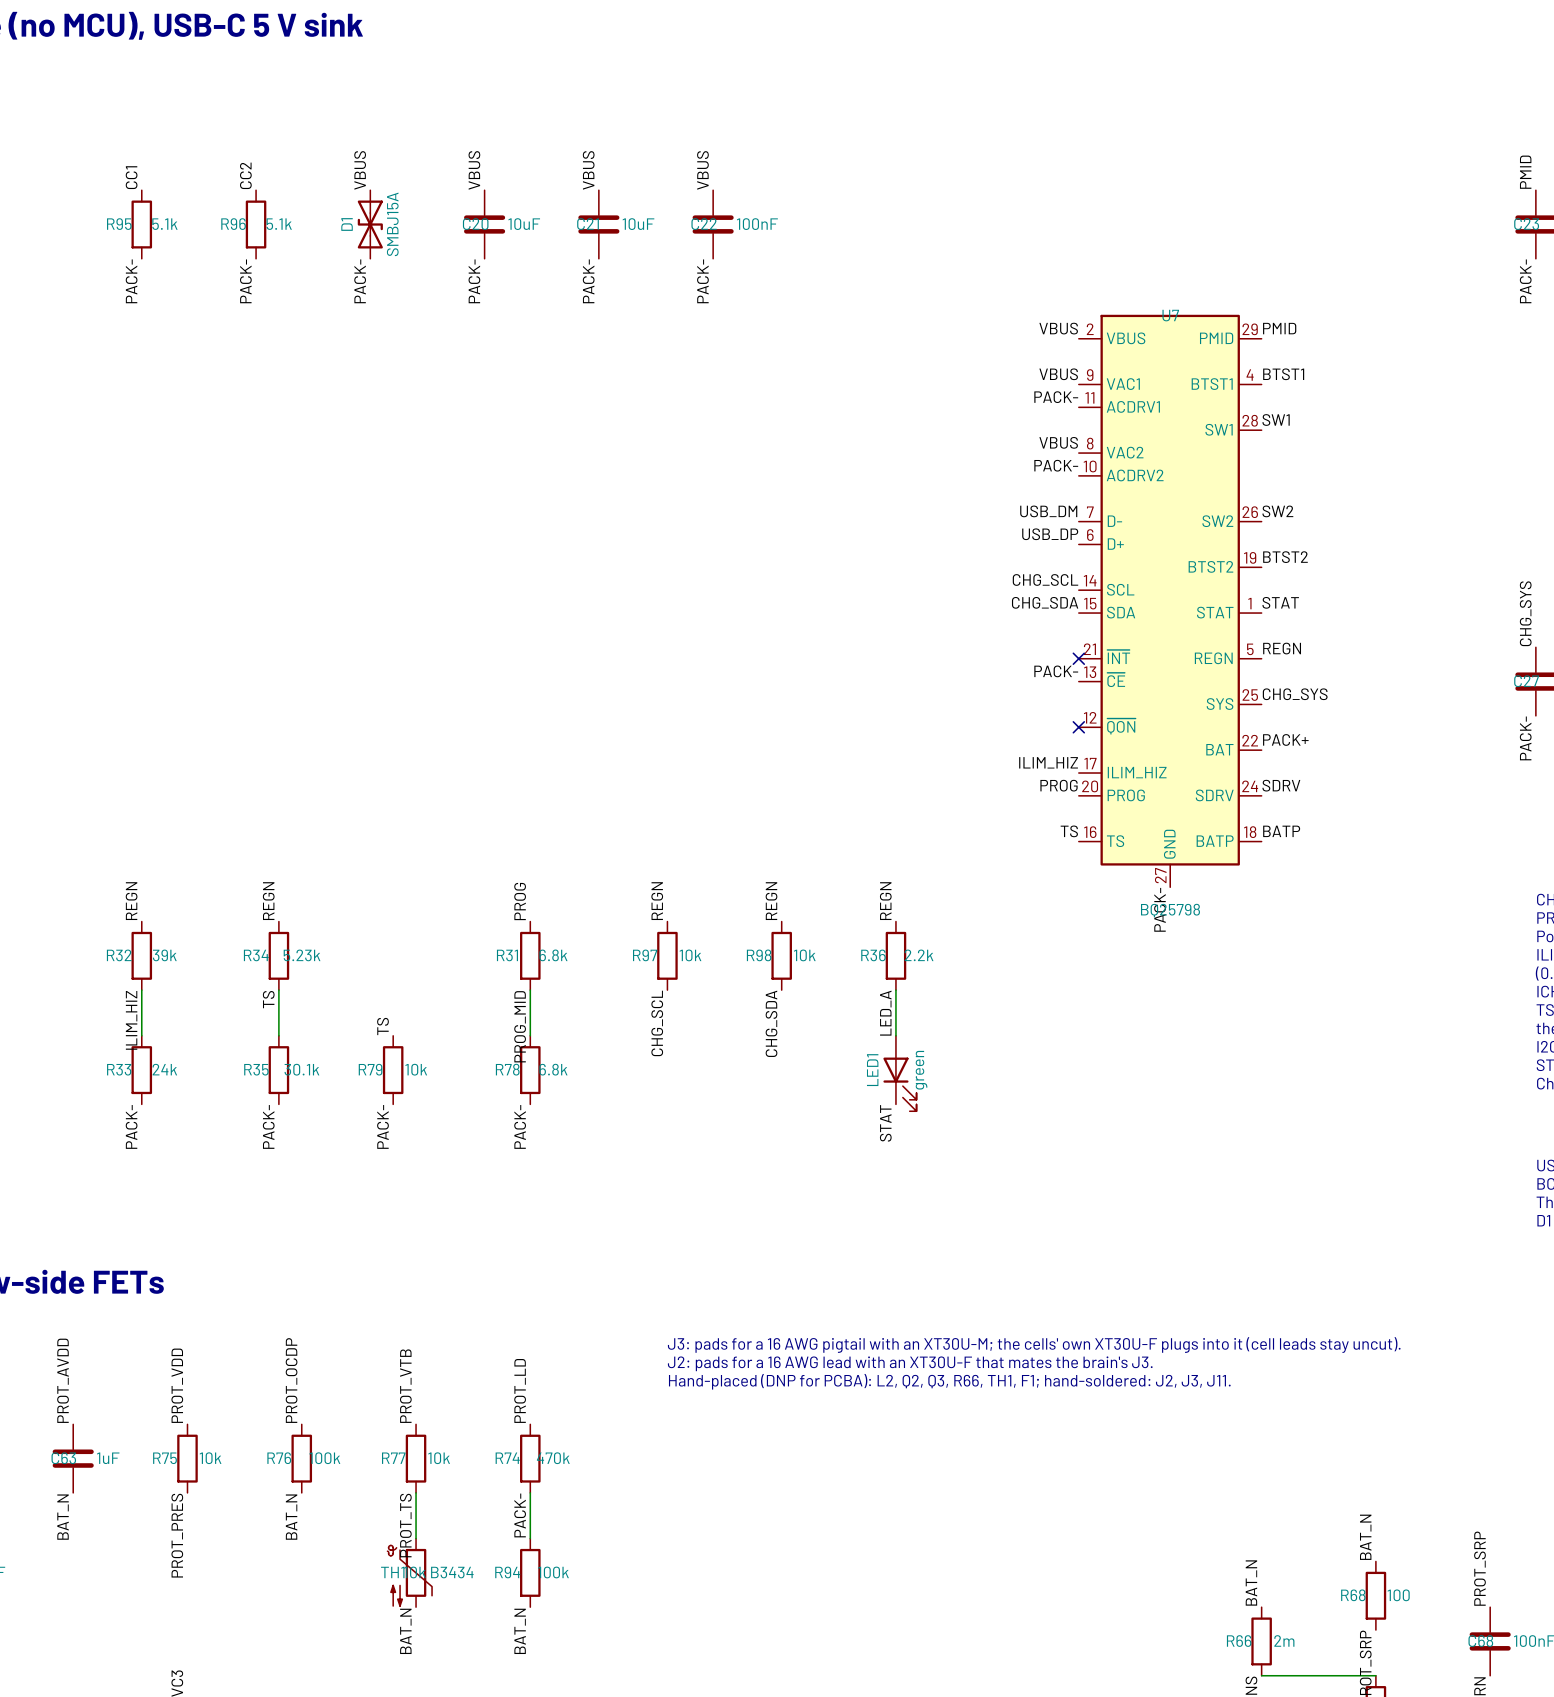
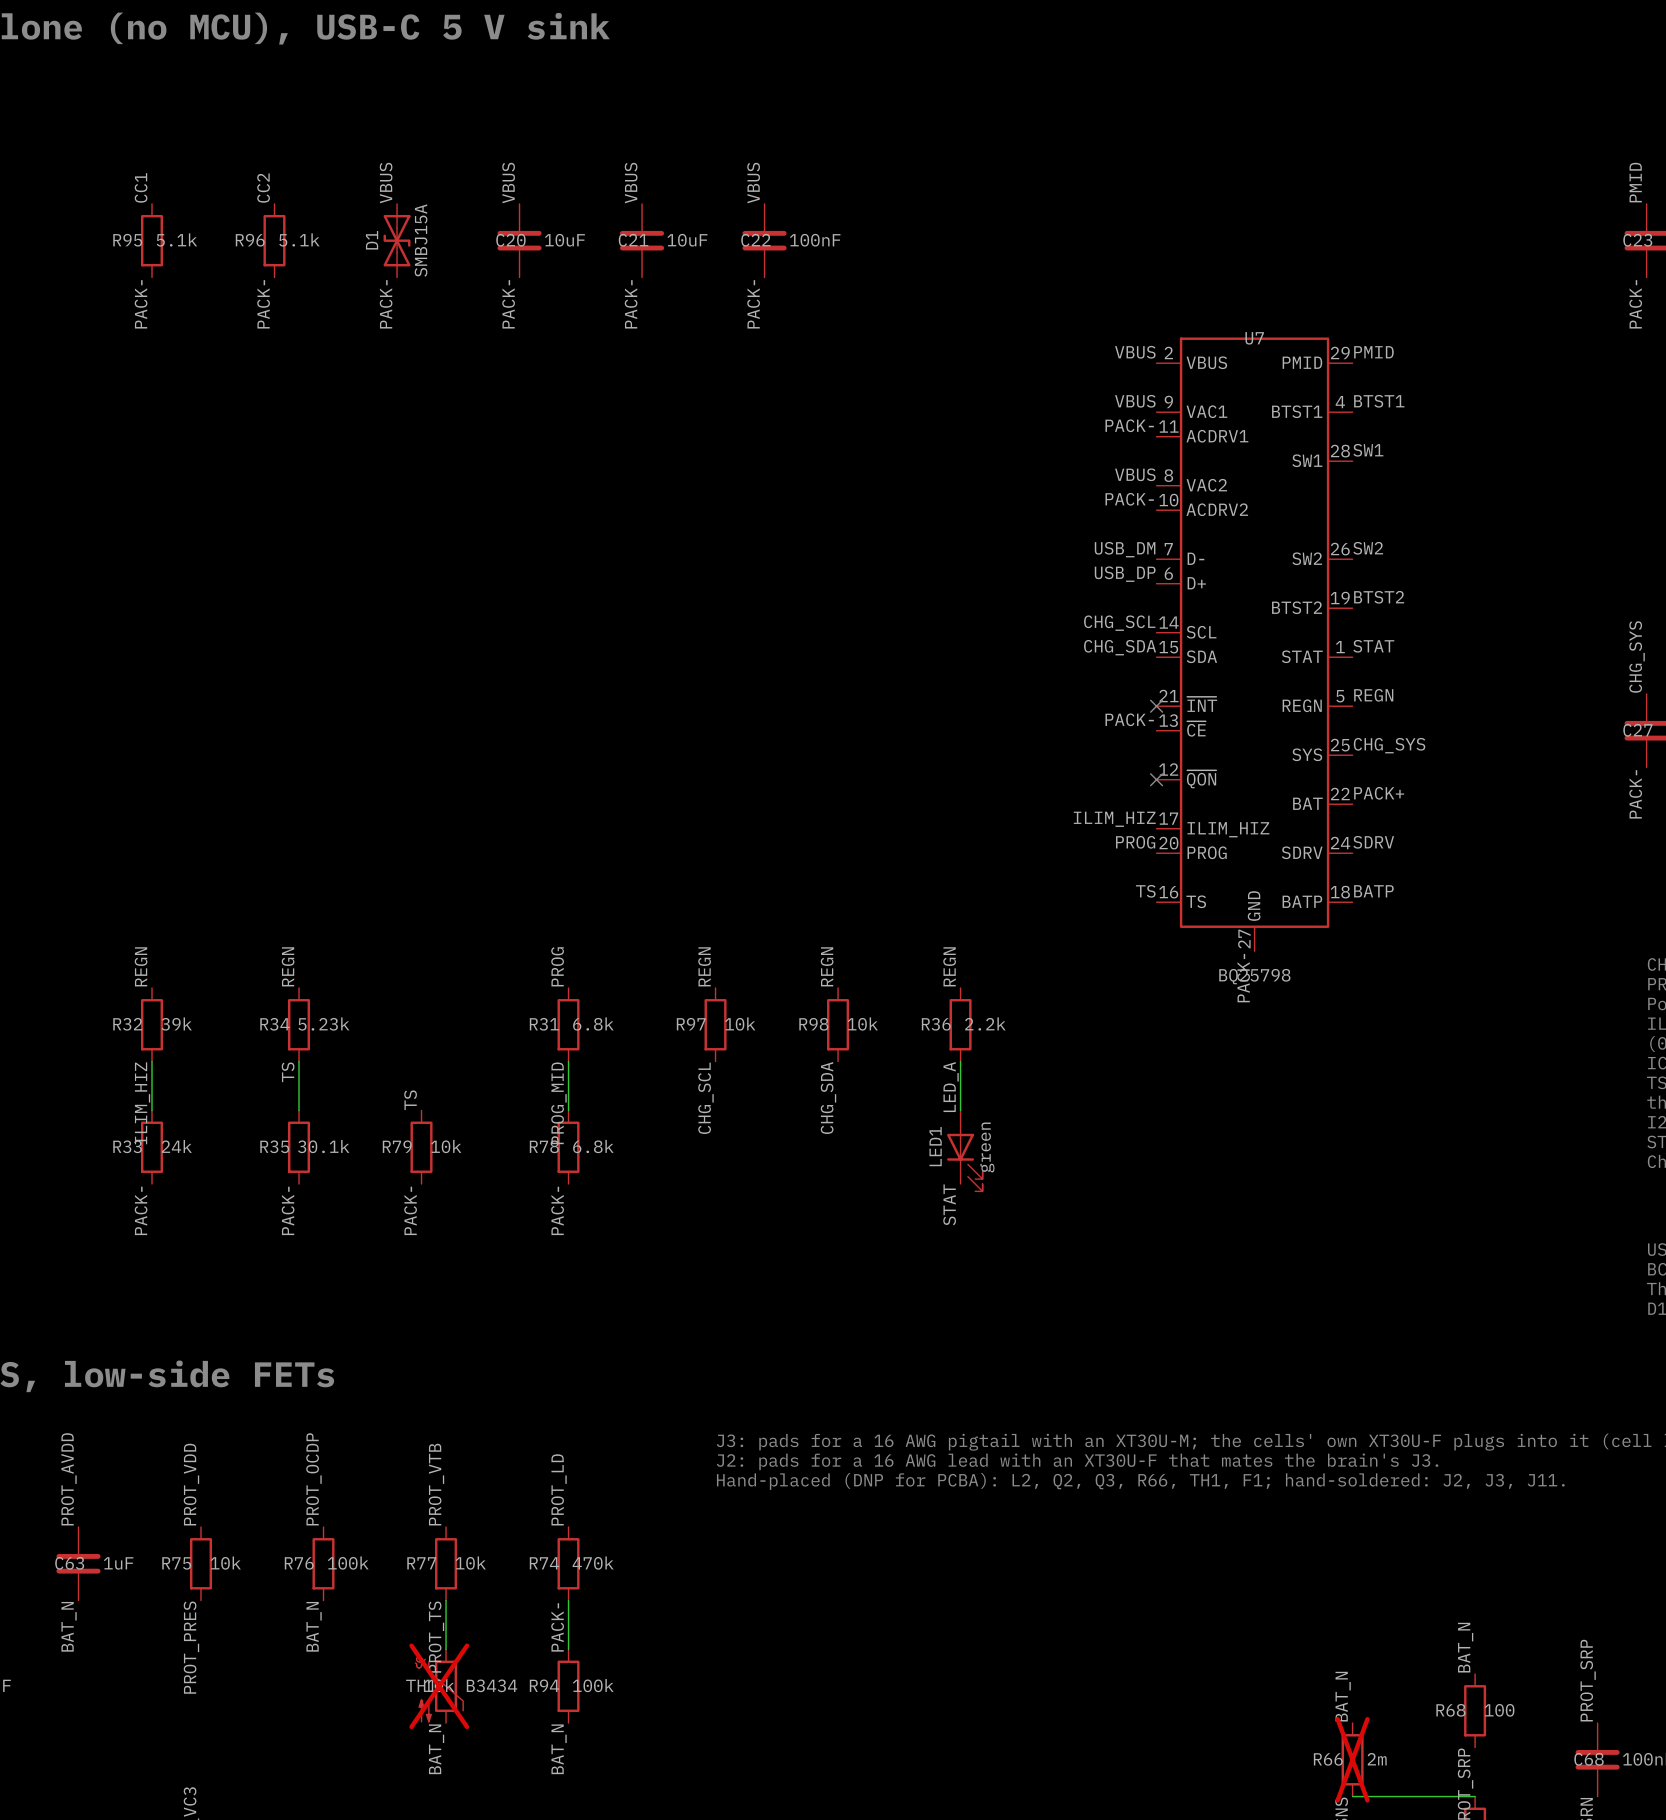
TH1 do-not-place cross: none -> (439, 1686)
R66 do-not-place cross: none -> (1352, 1759)

